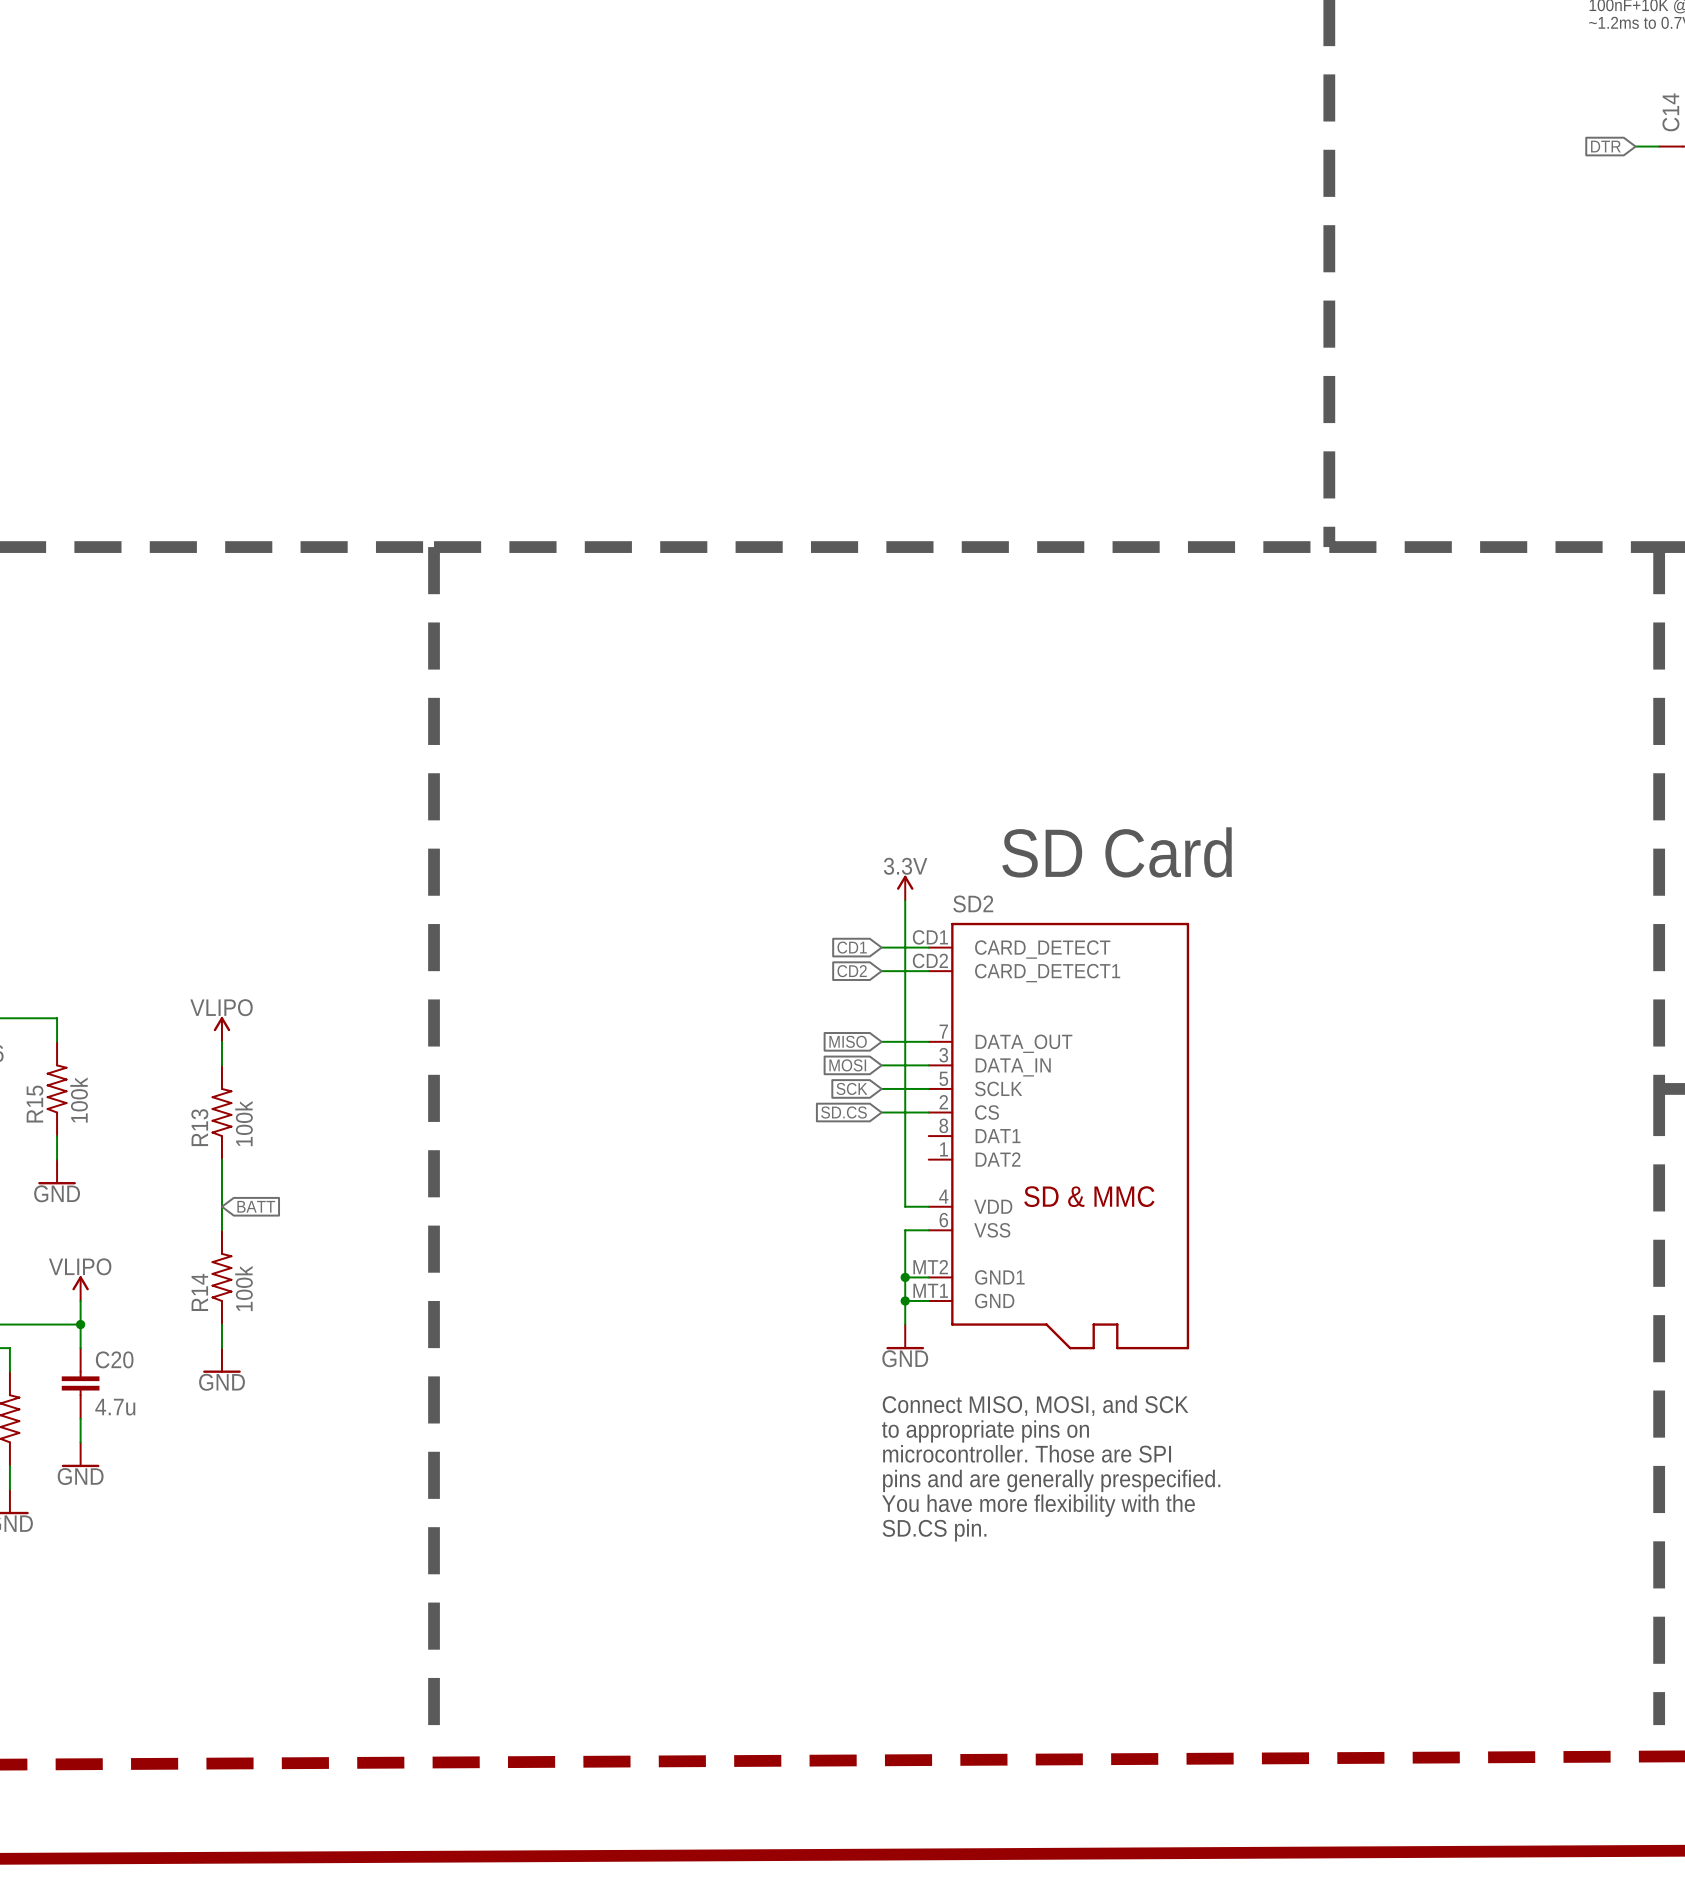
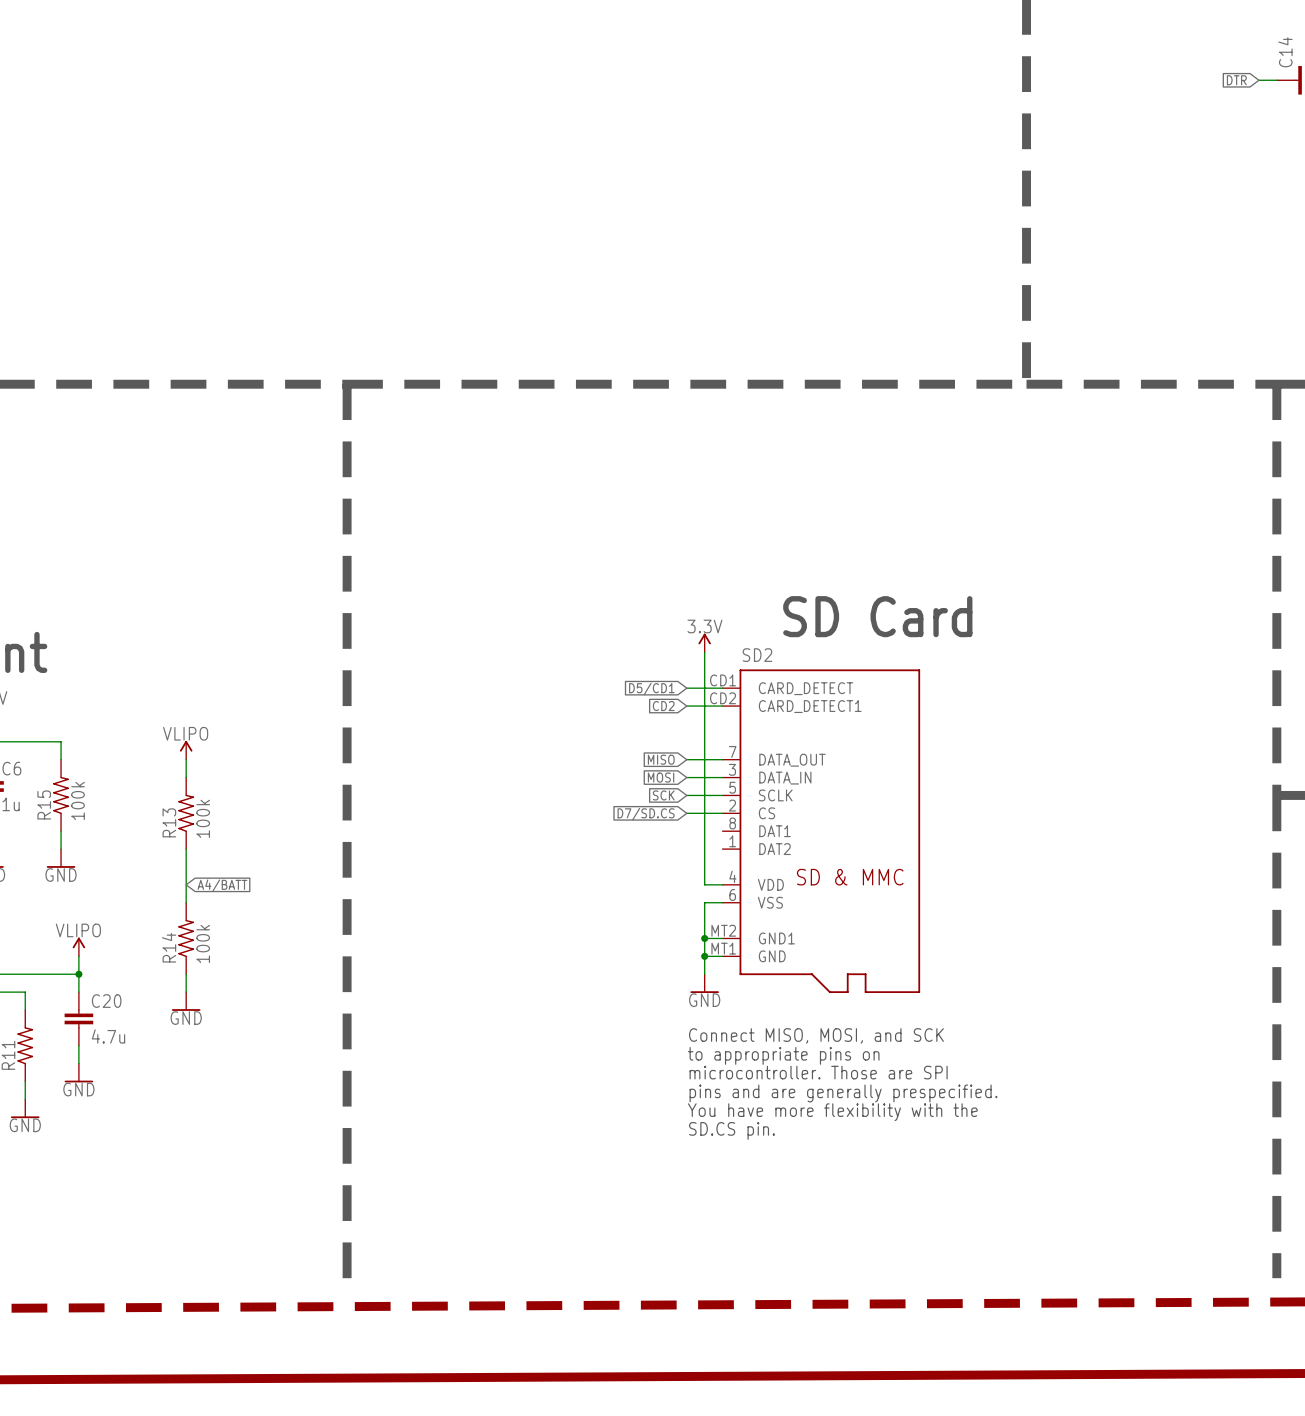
global label: CD1 (852, 947) -> D5/CD1 (651, 689)
global label: SD.CS (843, 1112) -> D7/SD.CS (646, 814)
global label: BATT (256, 1206) -> A4/BATT (222, 885)

